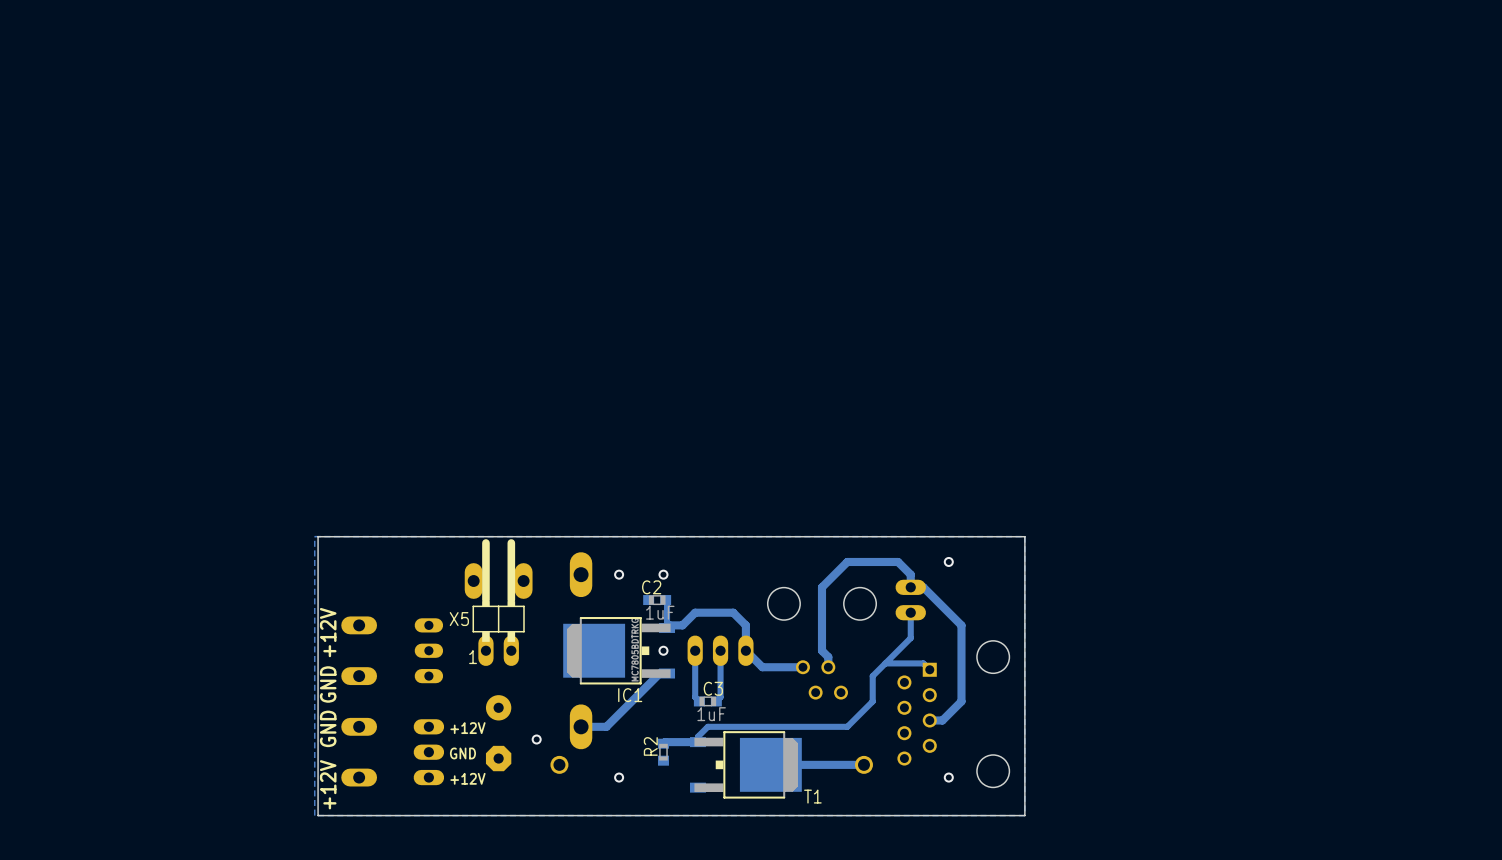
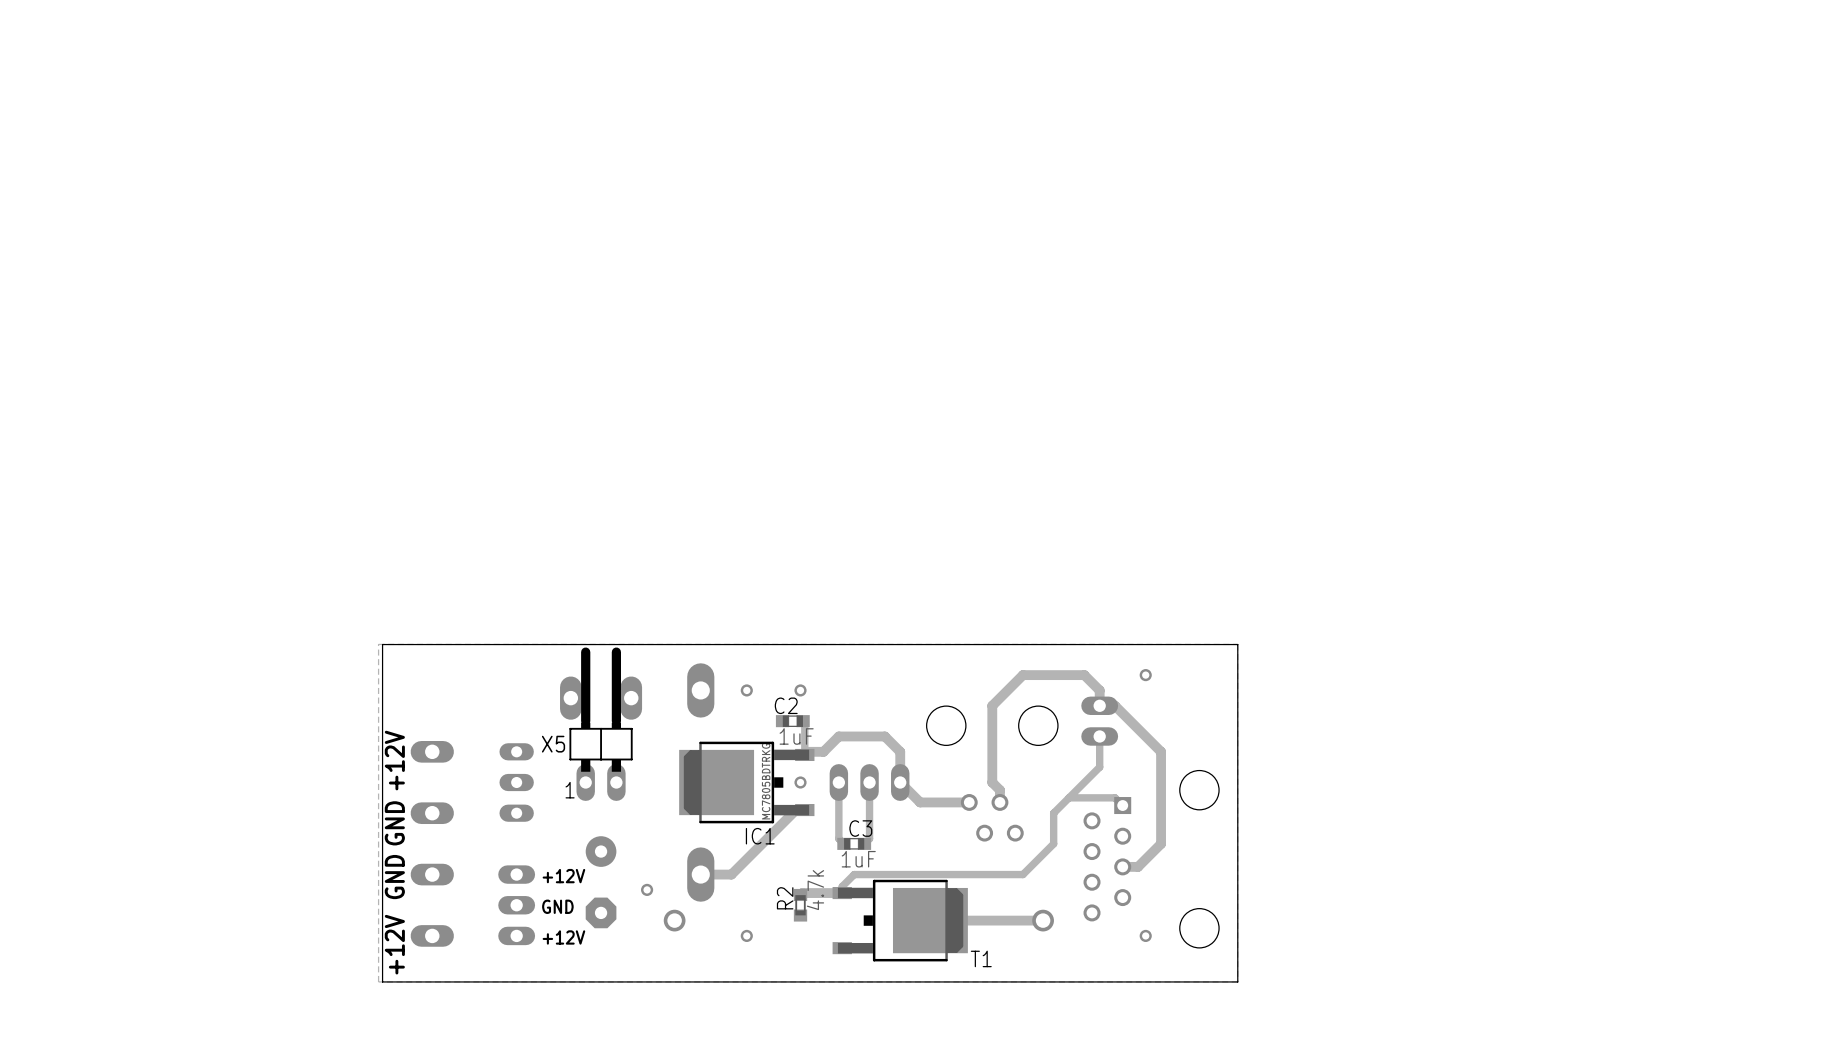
R2 value: none -> 4.7k (815, 890)

